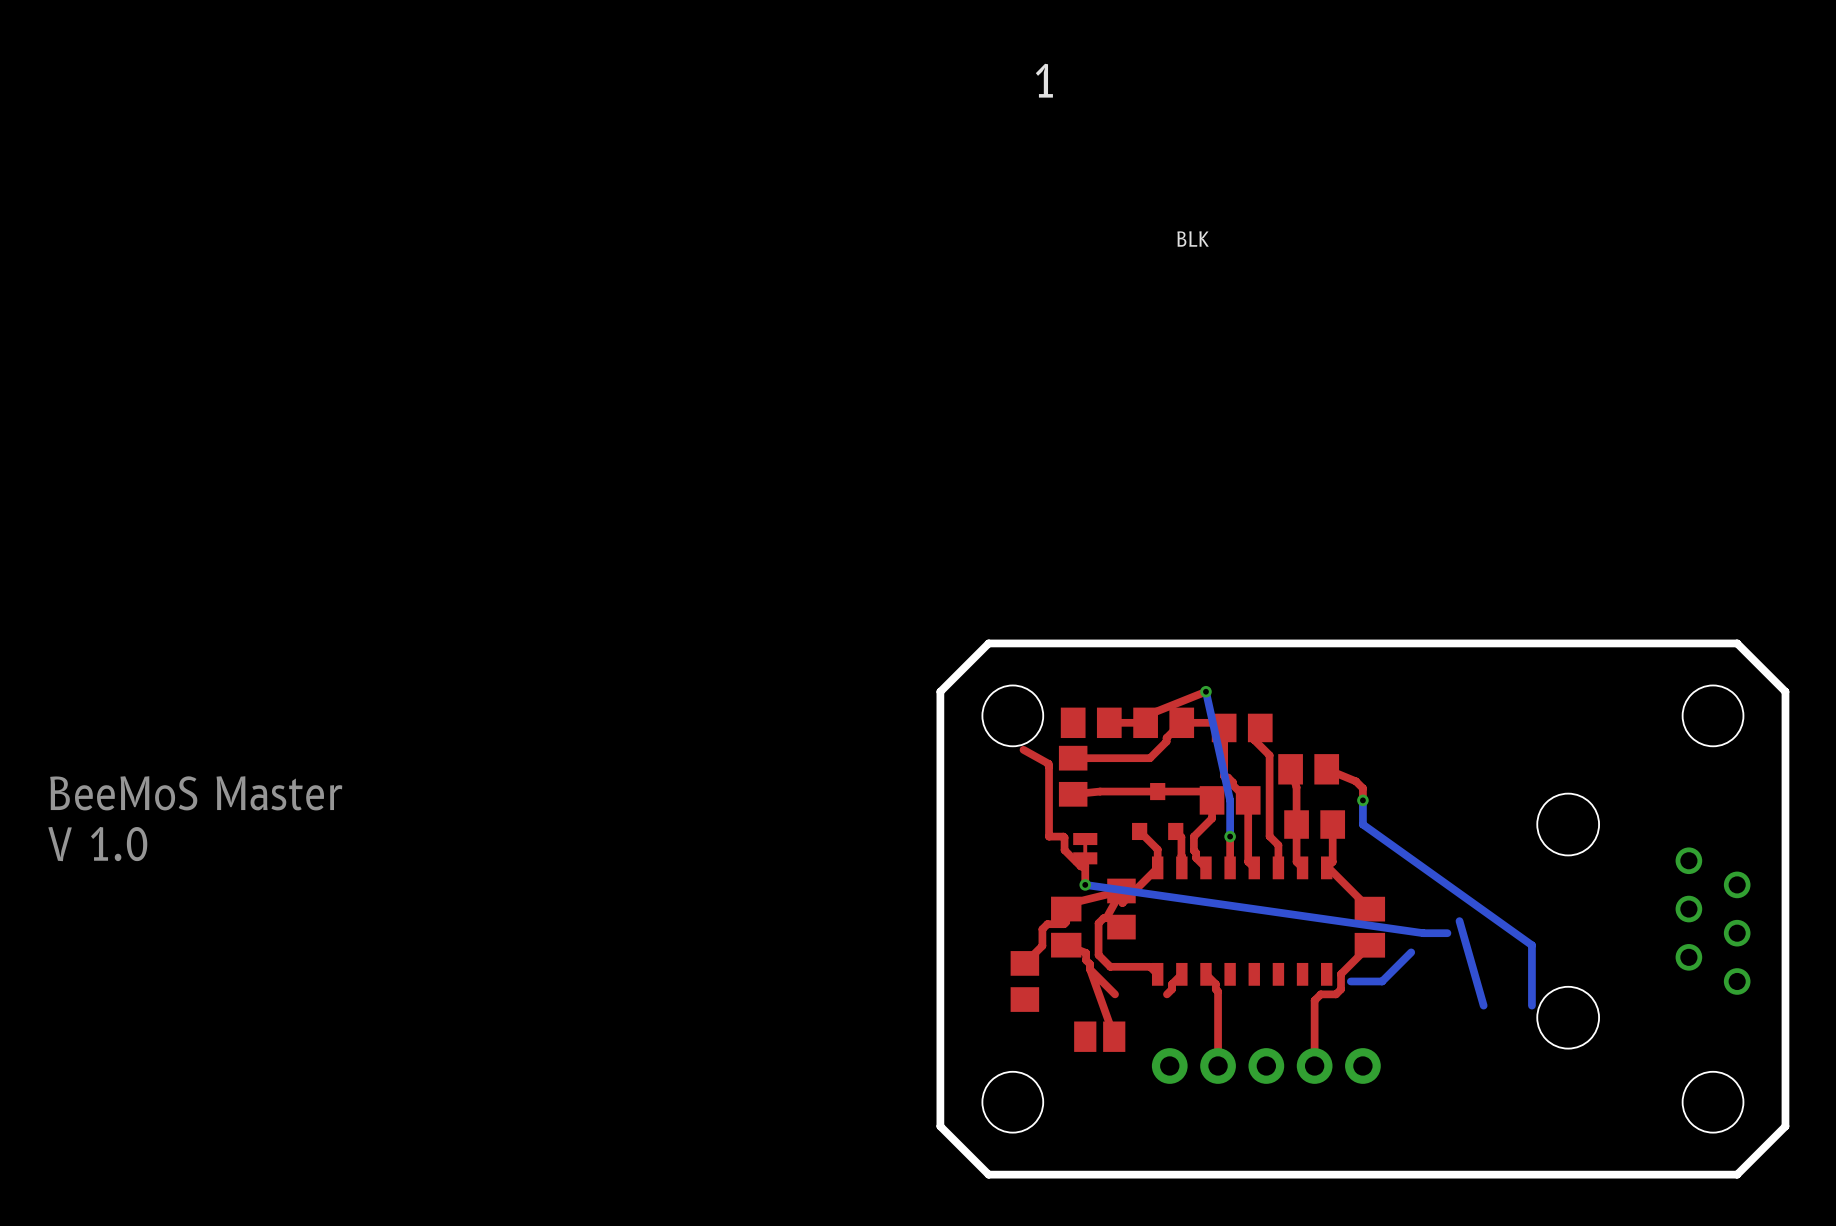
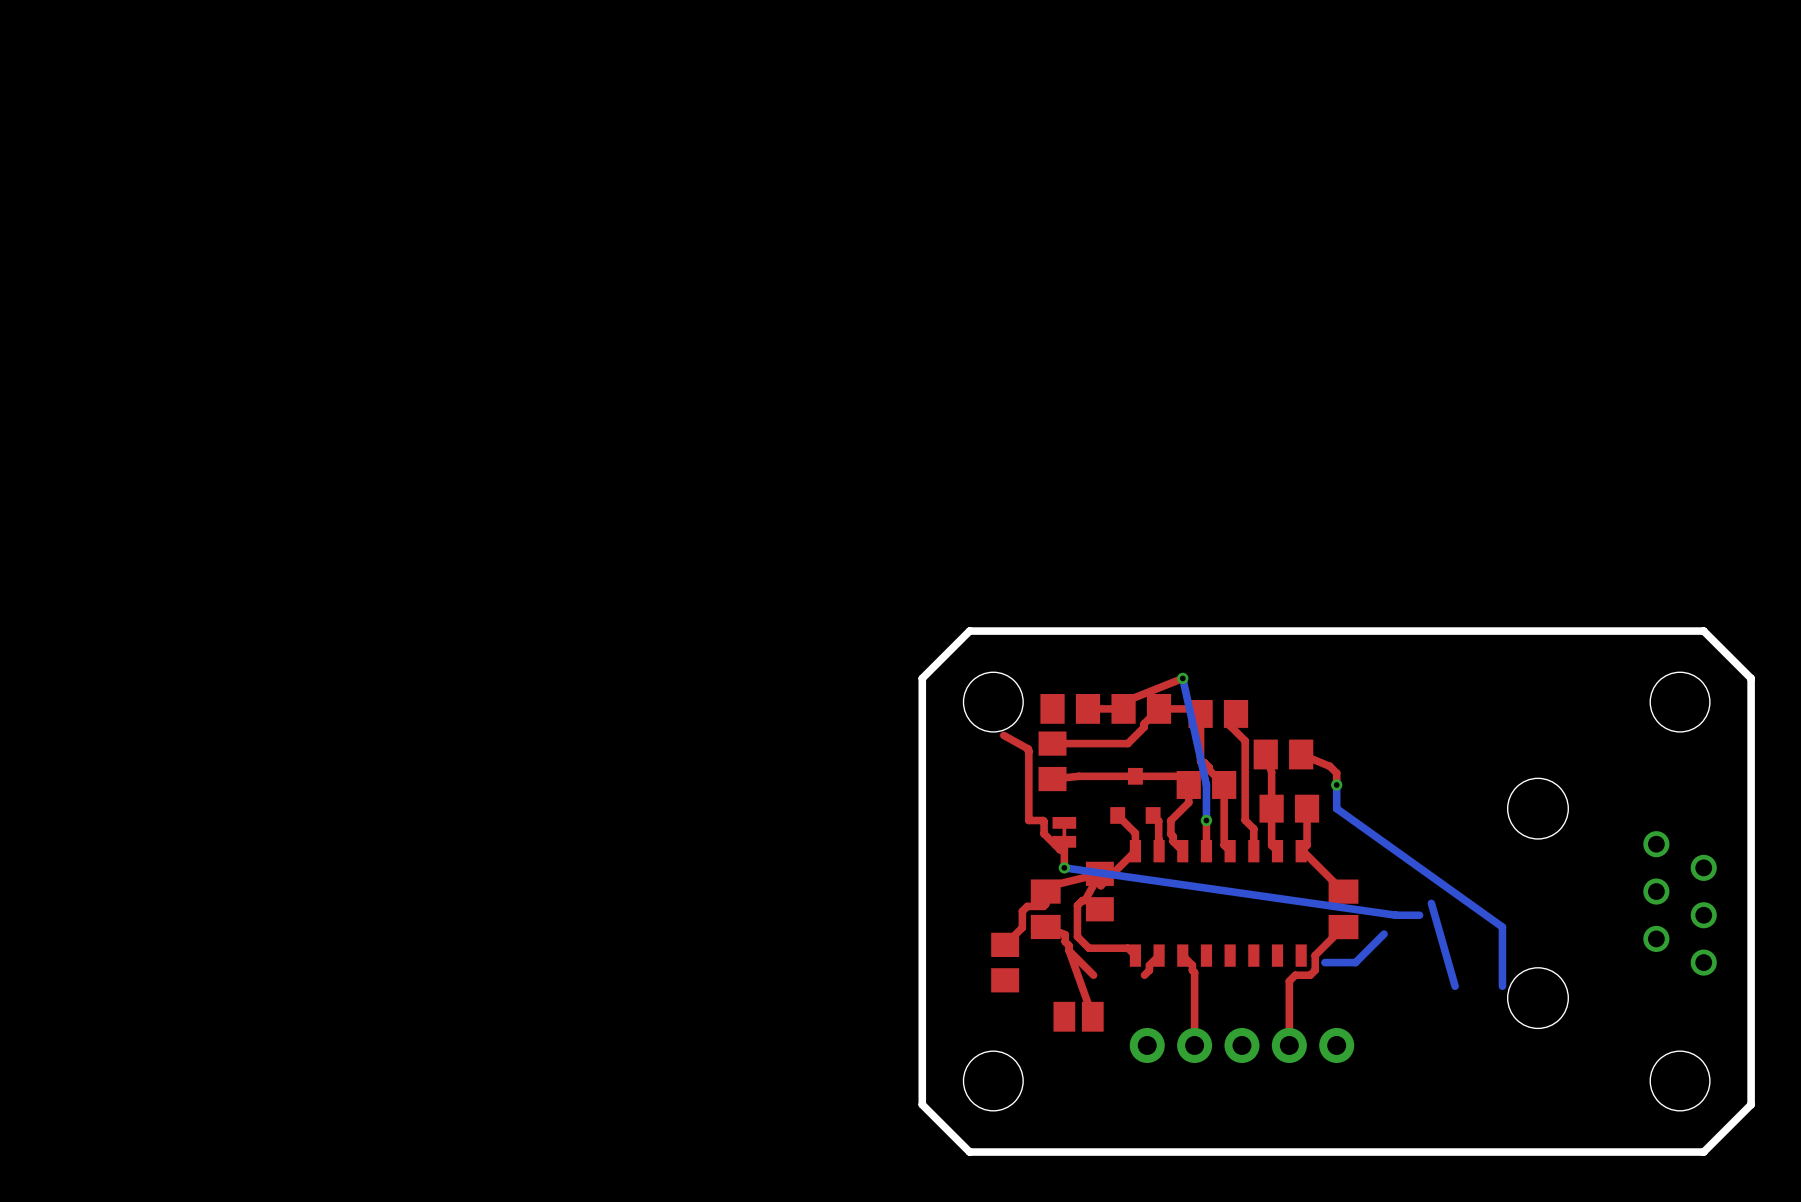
text: 1 (1044, 80) -> none
text: BLK (1193, 238) -> none
text: BeeMoS Master (196, 793) -> none
text: V 1.0 (97, 844) -> none

